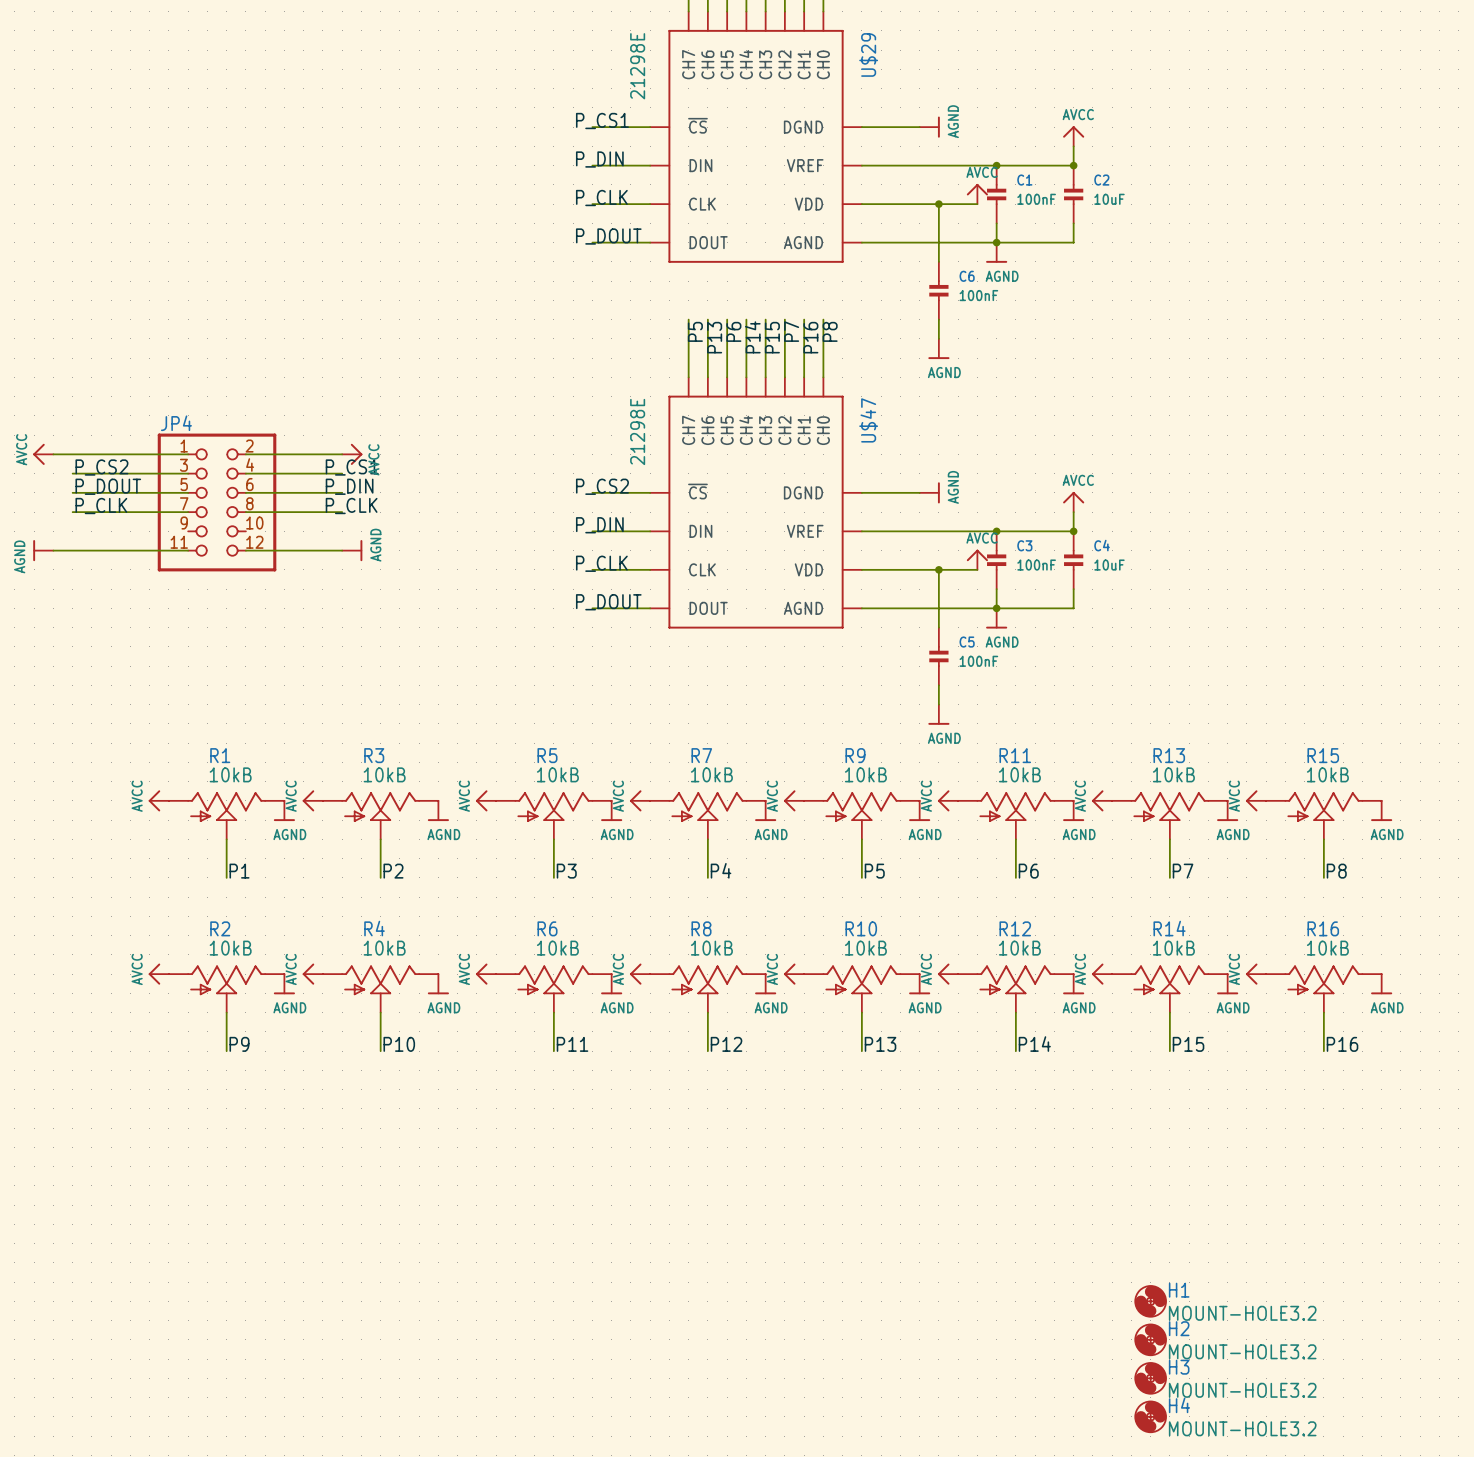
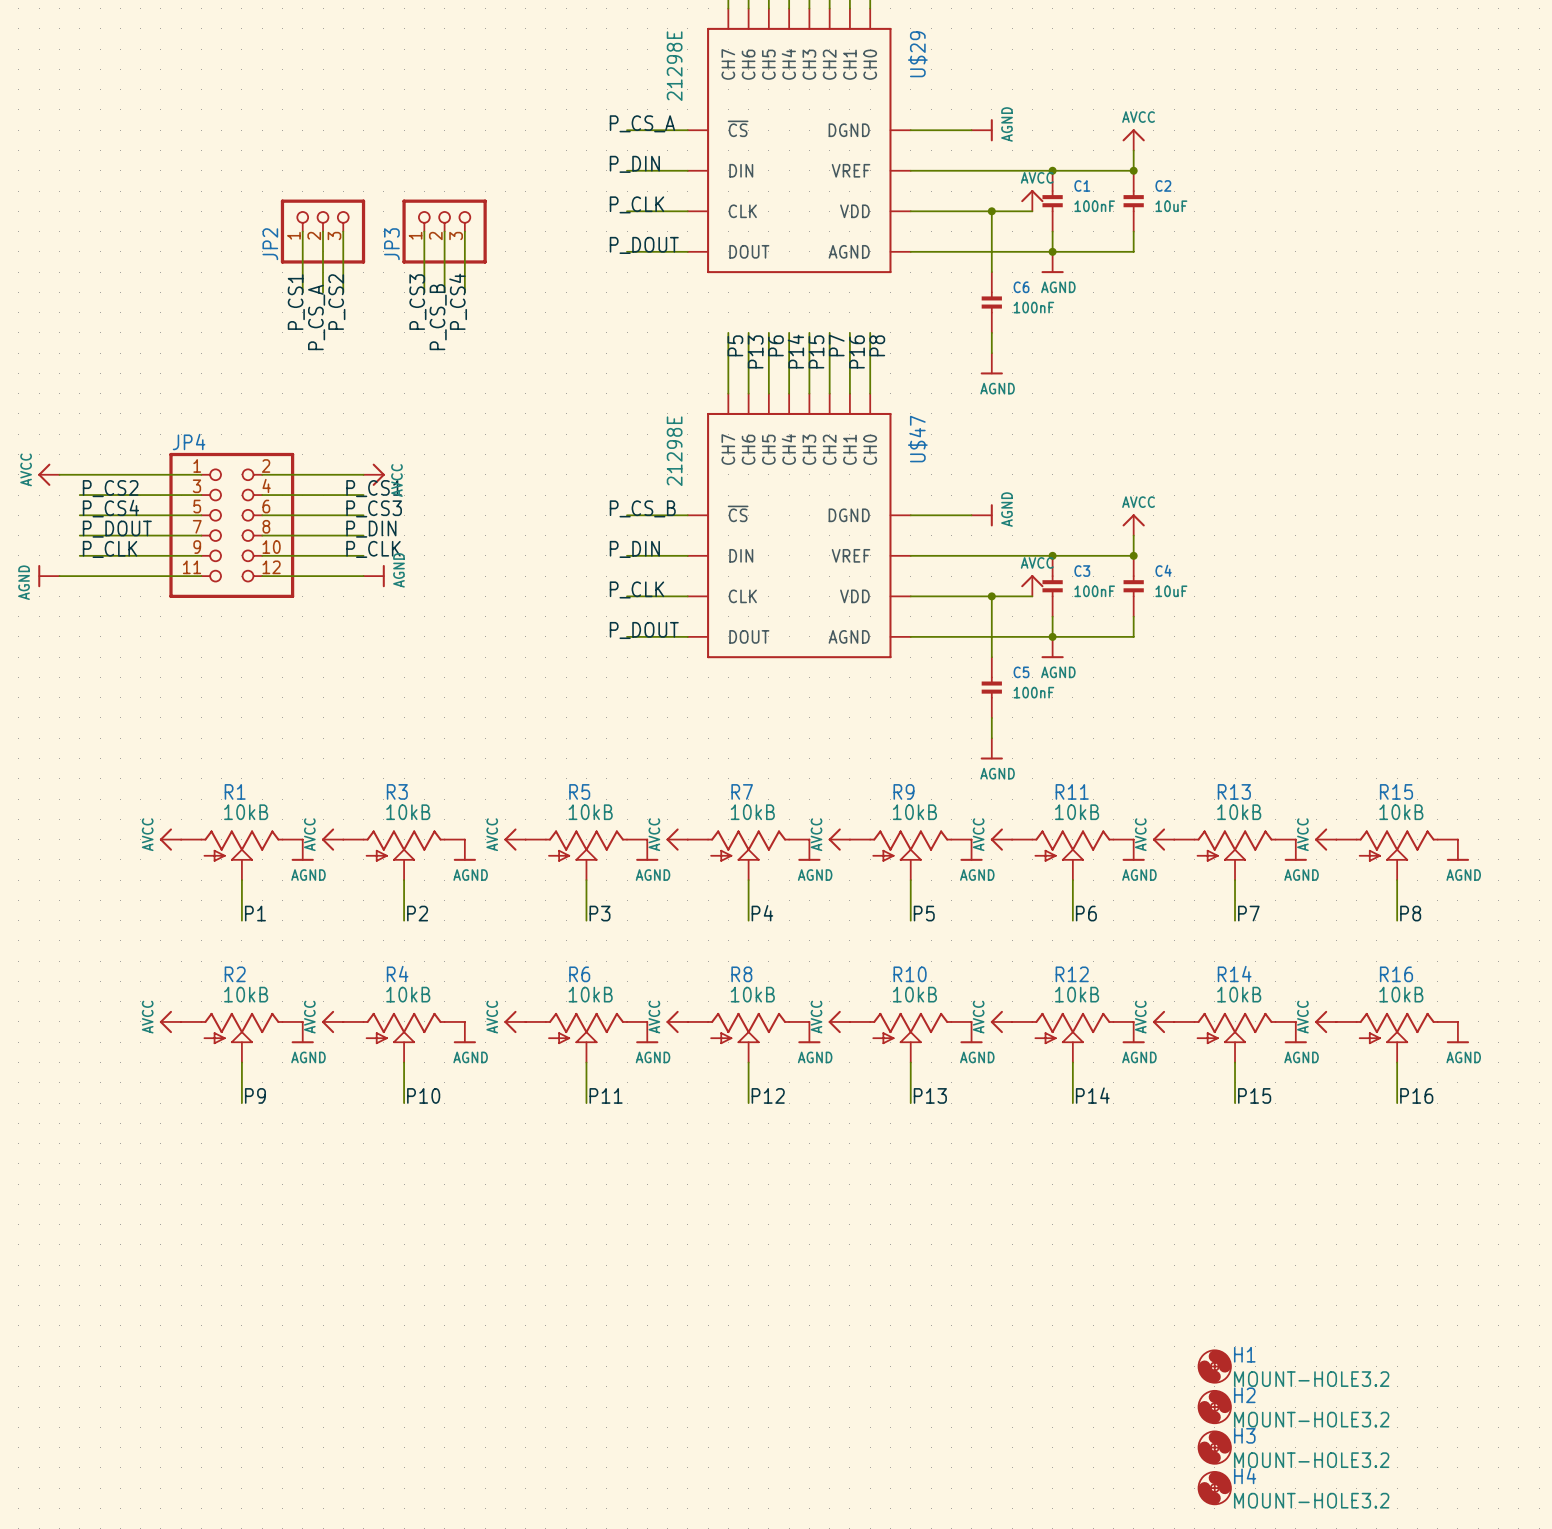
label: P_CS1 (602, 121) -> P_CS_A (642, 123)
wire: none -> (302, 231) (302, 292)
wire: none -> (323, 231) (323, 292)
JP2: none -> (323, 231)
wire: none -> (343, 231) (343, 292)
wire: none -> (424, 231) (424, 292)
wire: none -> (444, 231) (444, 292)
JP3: none -> (444, 231)
wire: none -> (464, 231) (464, 292)
label: none -> P_CS1 (296, 302)
label: none -> P_CS2 (336, 302)
label: none -> P_CS3 (417, 302)
label: none -> P_CS4 (458, 301)
label: none -> P_CS_A (316, 317)
label: none -> P_CS_B (438, 317)
label: P_DOUT (108, 486) -> P_CS4 (110, 508)
label: P_DIN (349, 486) -> P_CS3 (374, 508)
label: P_CS2 (602, 486) -> P_CS_B (642, 508)
label: P_CLK (101, 506) -> P_DOUT (117, 529)
label: P_CLK (351, 506) -> P_DIN (371, 529)
label: none -> P_CLK (110, 549)
label: none -> P_CLK (373, 549)
wire: none -> (79, 555) (201, 555)
wire: none -> (262, 555) (363, 555)

